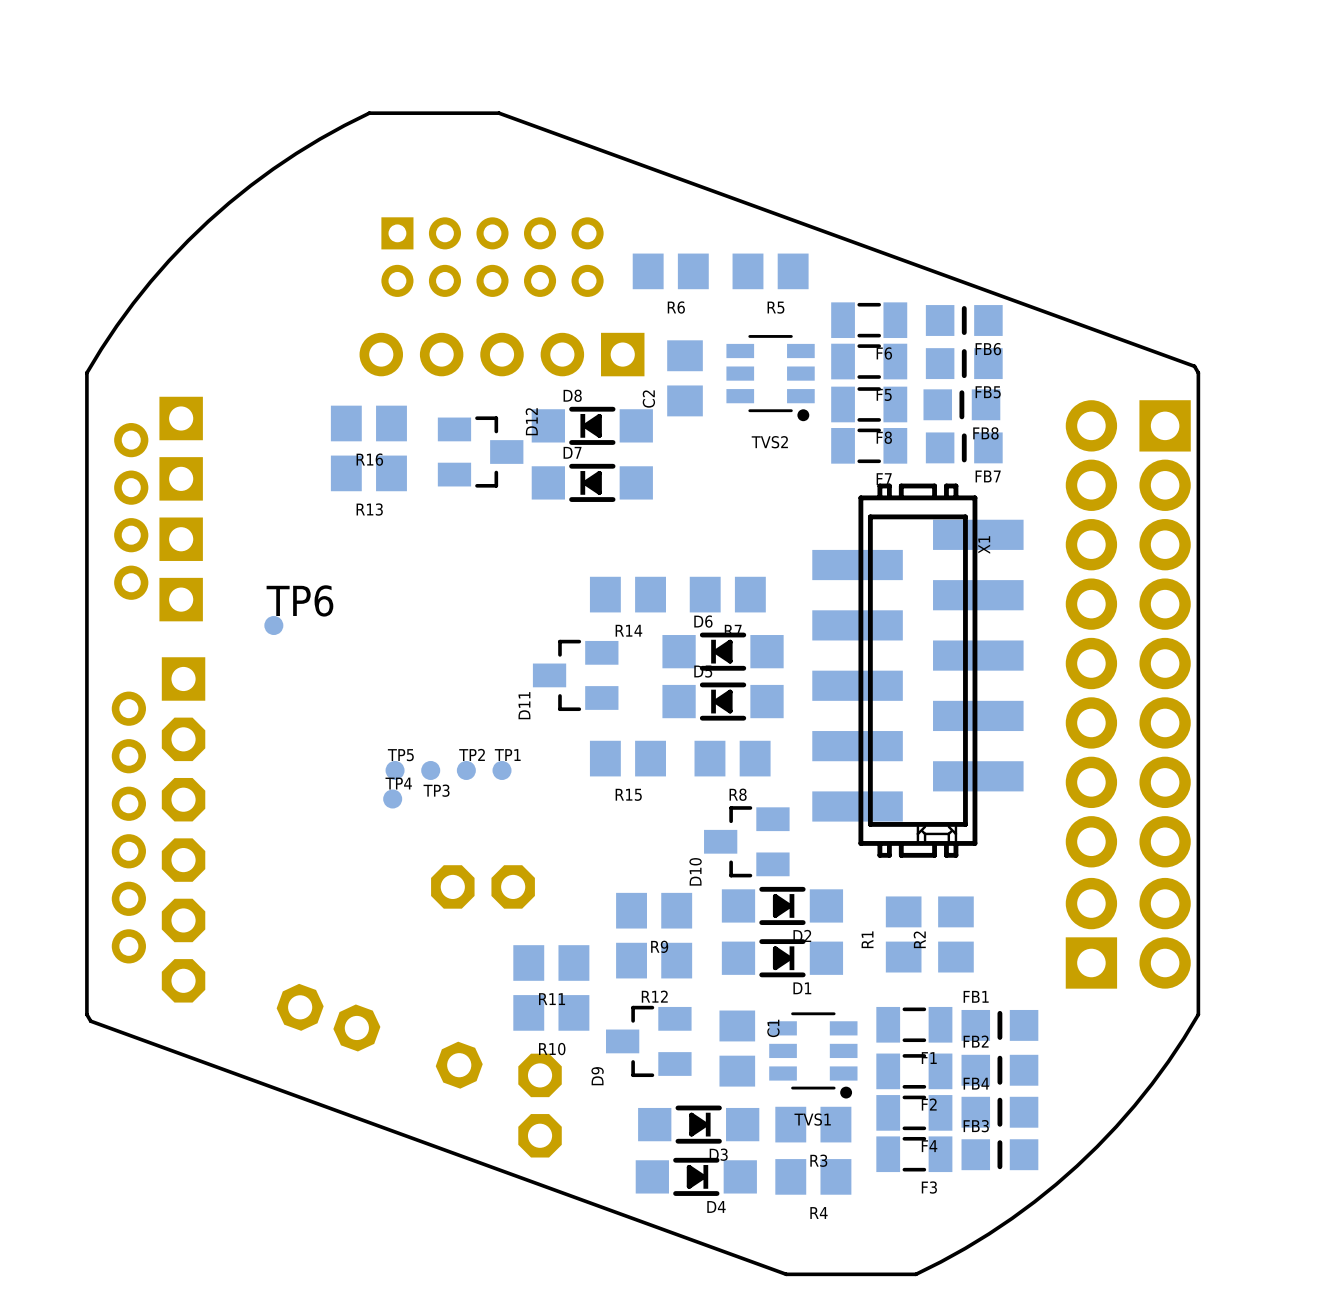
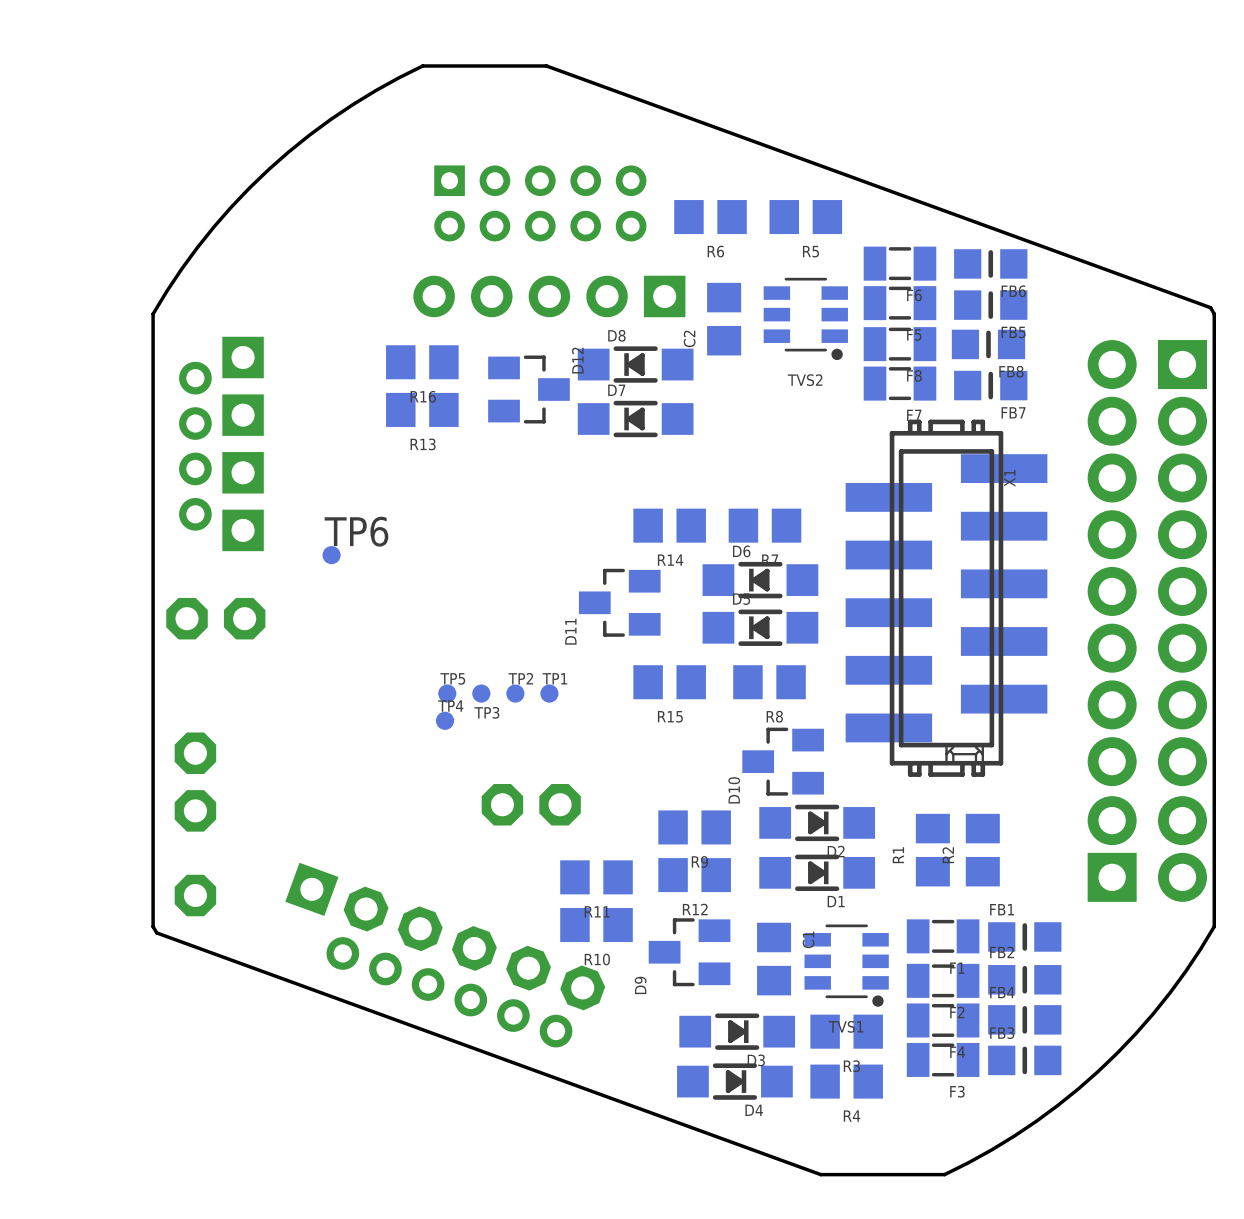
part: none -> (215, 618)
part: (128, 827) -> none
part: (183, 829) -> none
part: none -> (195, 782)
part: none -> (195, 895)
part: (328, 1017) -> none
part: none -> (445, 936)
part: (459, 1065) -> none
part: none -> (449, 992)
part: (540, 1105) -> none

